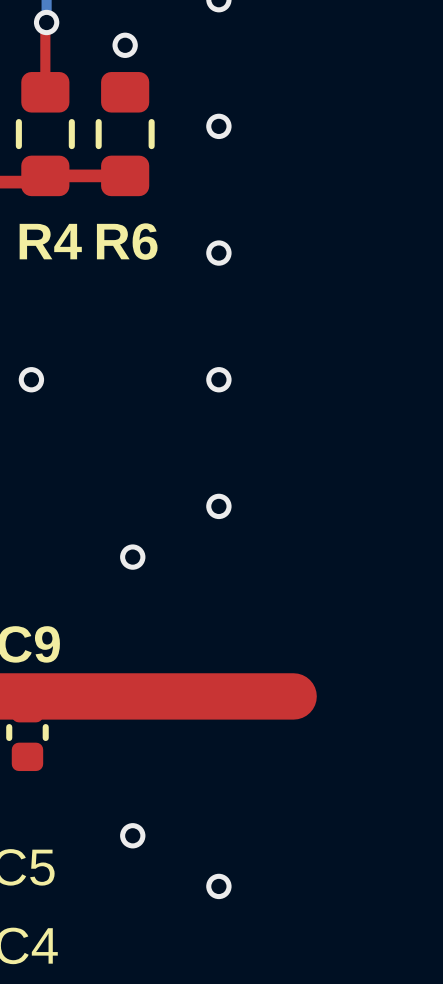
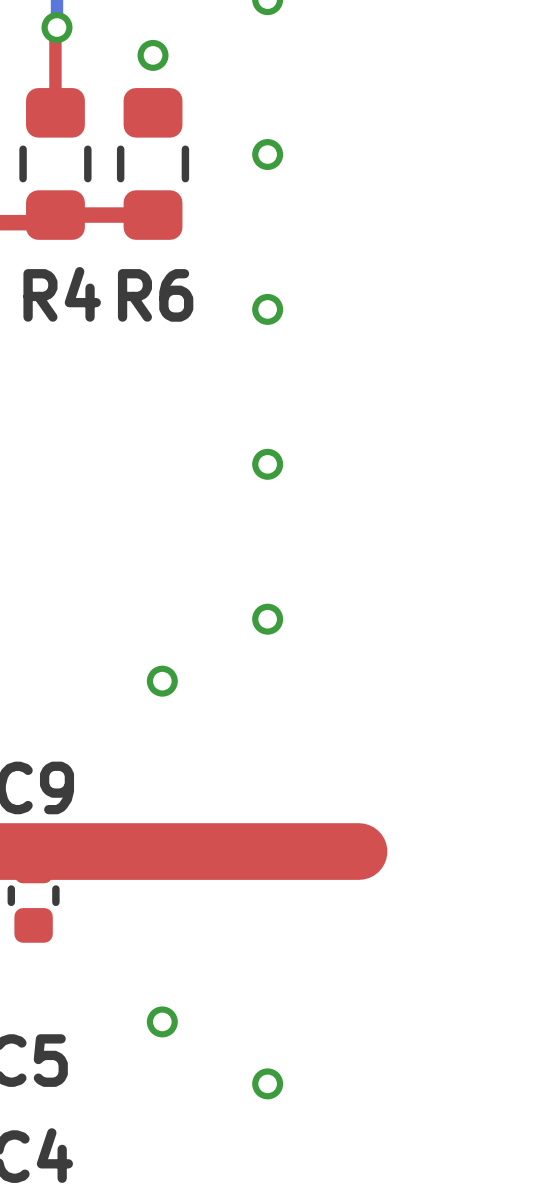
via: (31, 379) -> none

